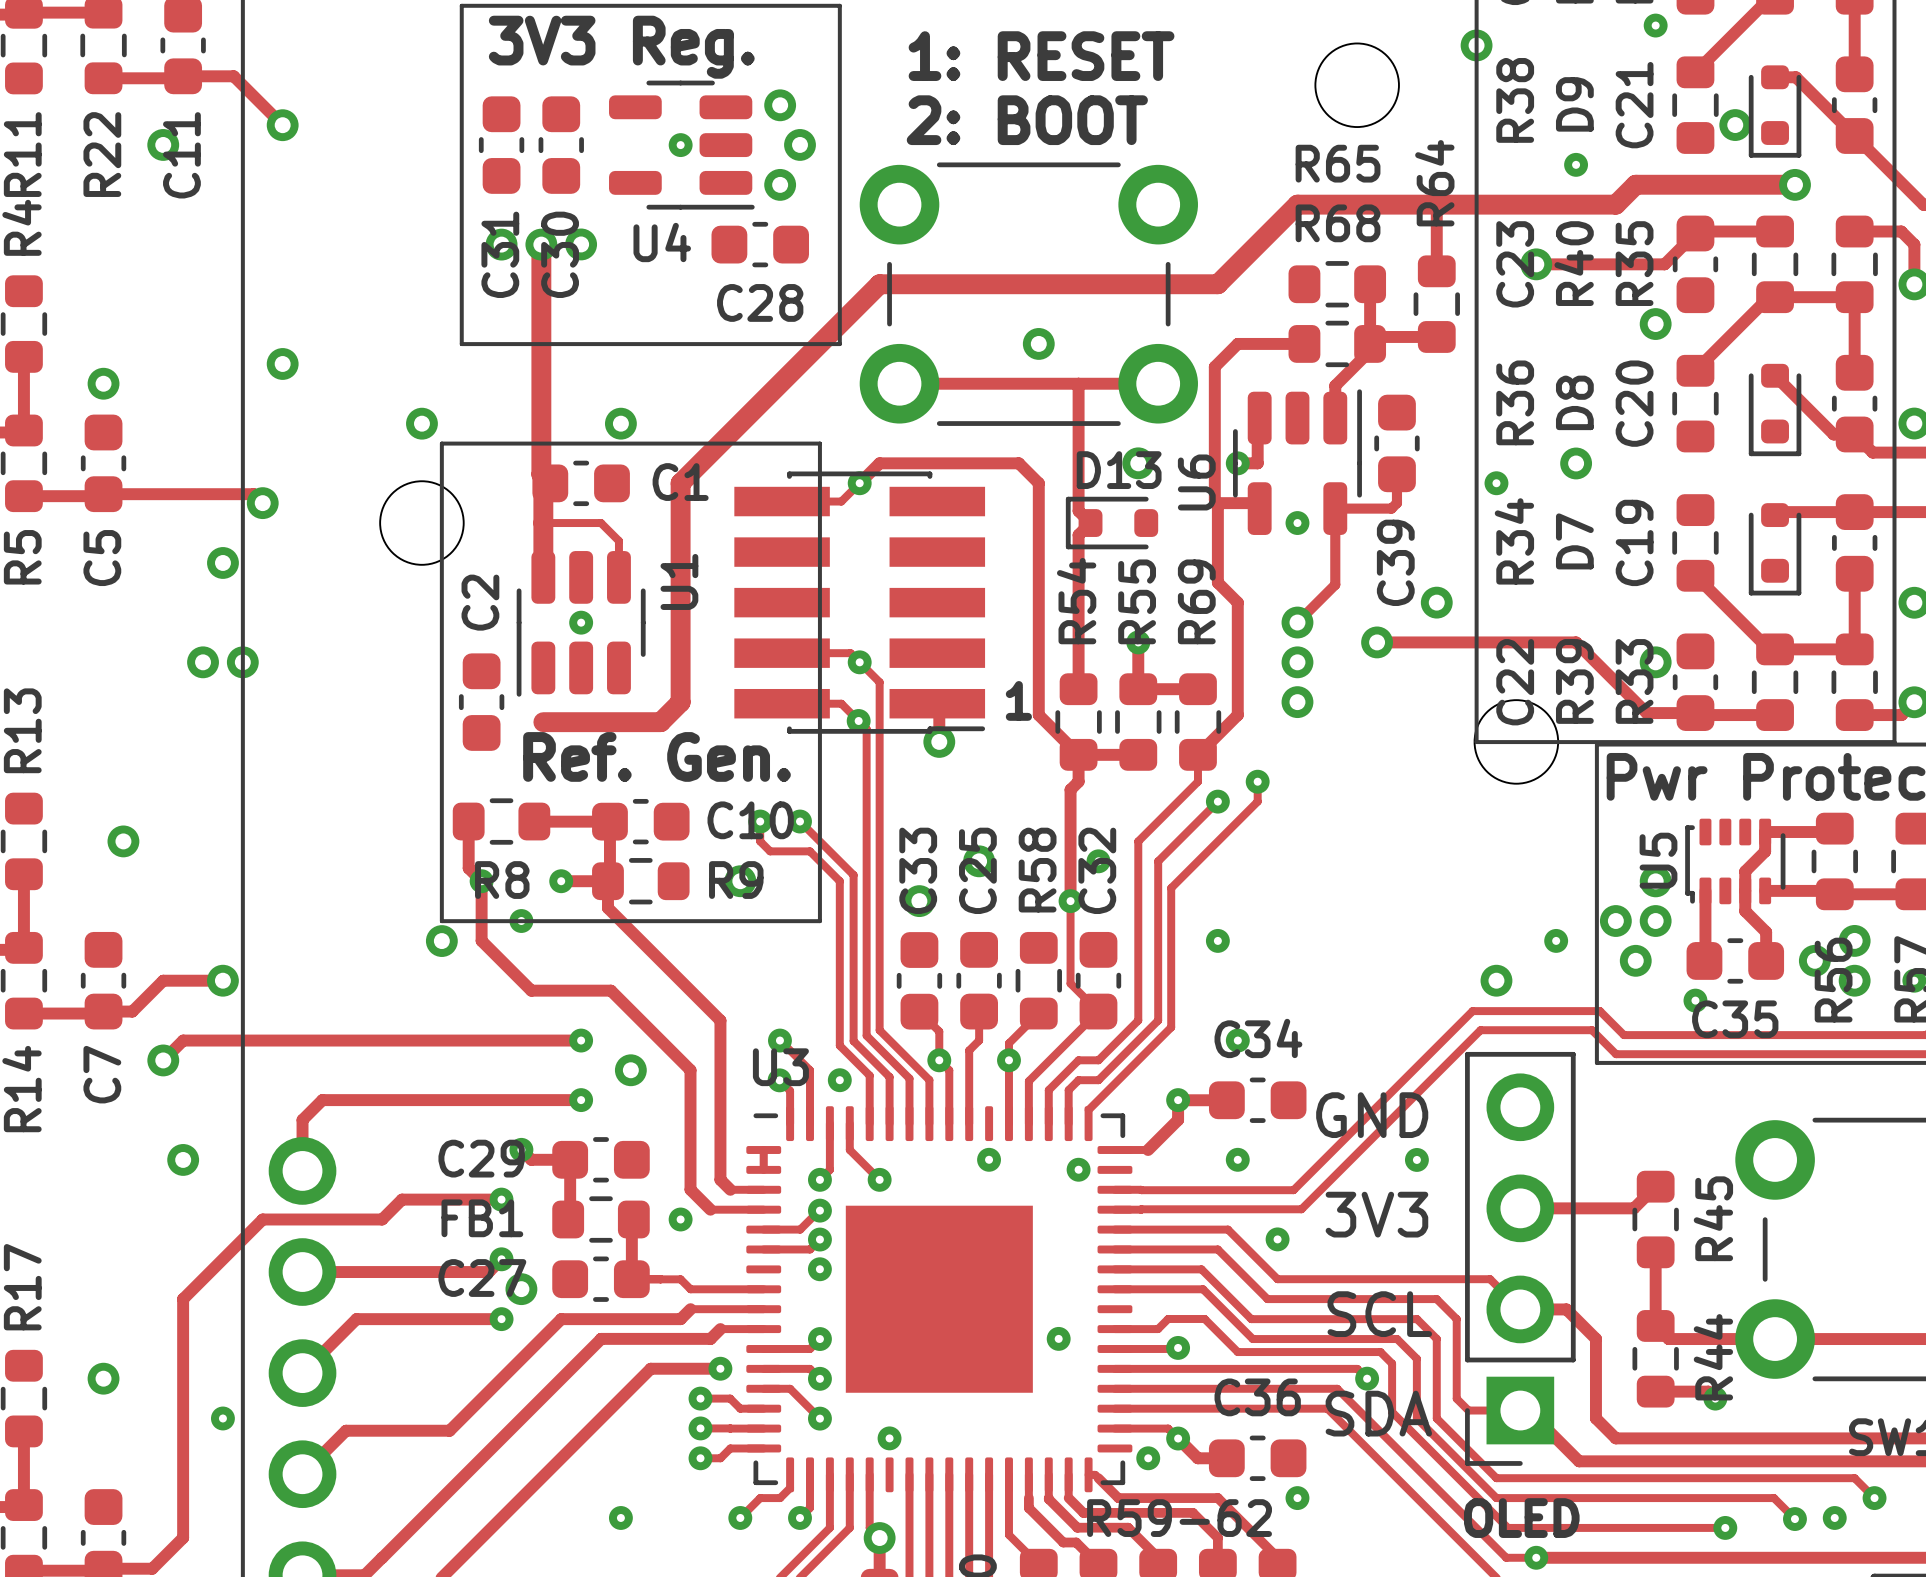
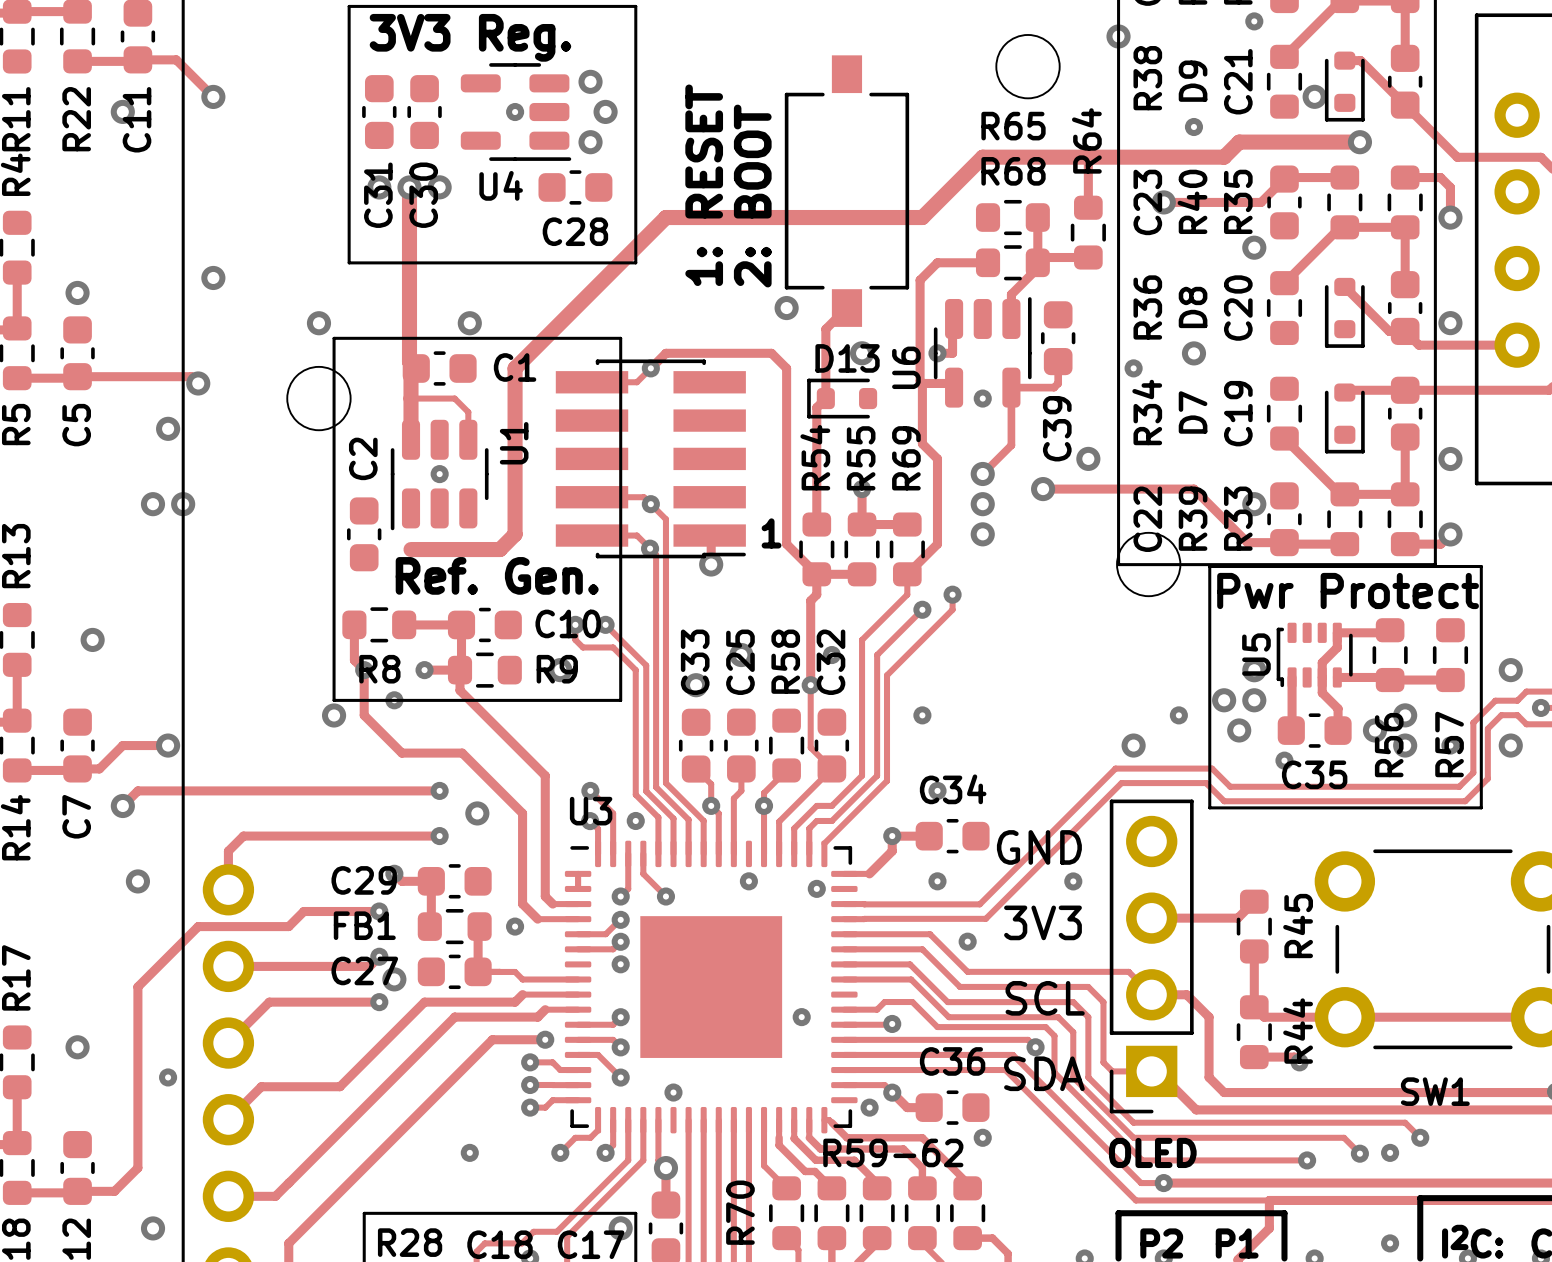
text rotation: 0° (1041, 56) -> 90° counterclockwise (704, 185)
text rotation: 0° (1027, 120) -> 90° counterclockwise (752, 196)
part: none -> (846, 191)
part: (1028, 294) -> none
via position: (1038, 343) -> (786, 308)
track: (899, 383) (1158, 383) -> none
track: (1078, 383) (1078, 511) (1090, 523) -> (846, 308) (825, 329) (825, 398)

